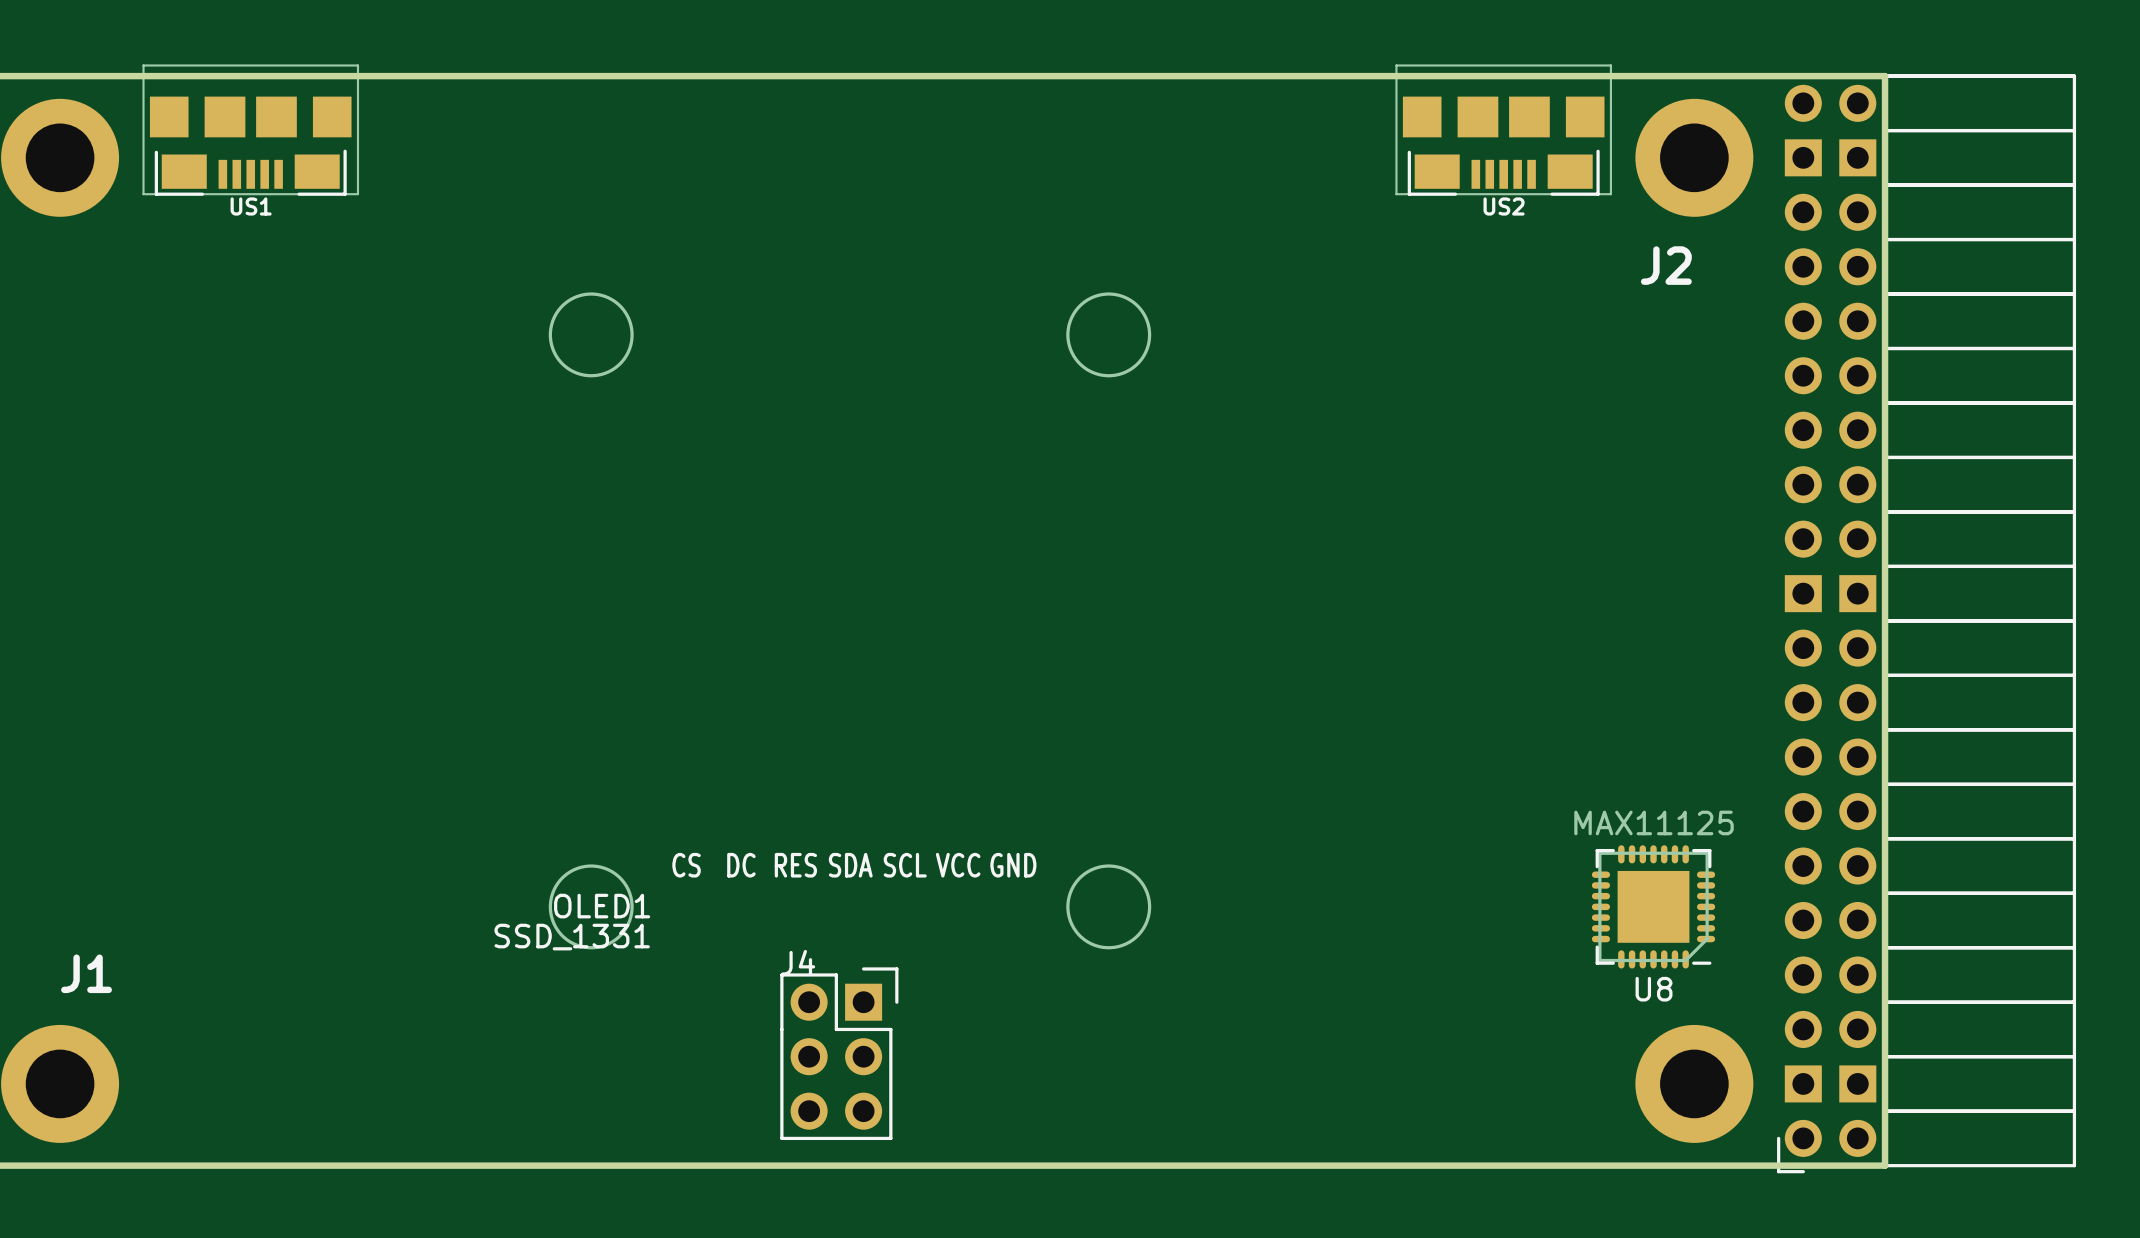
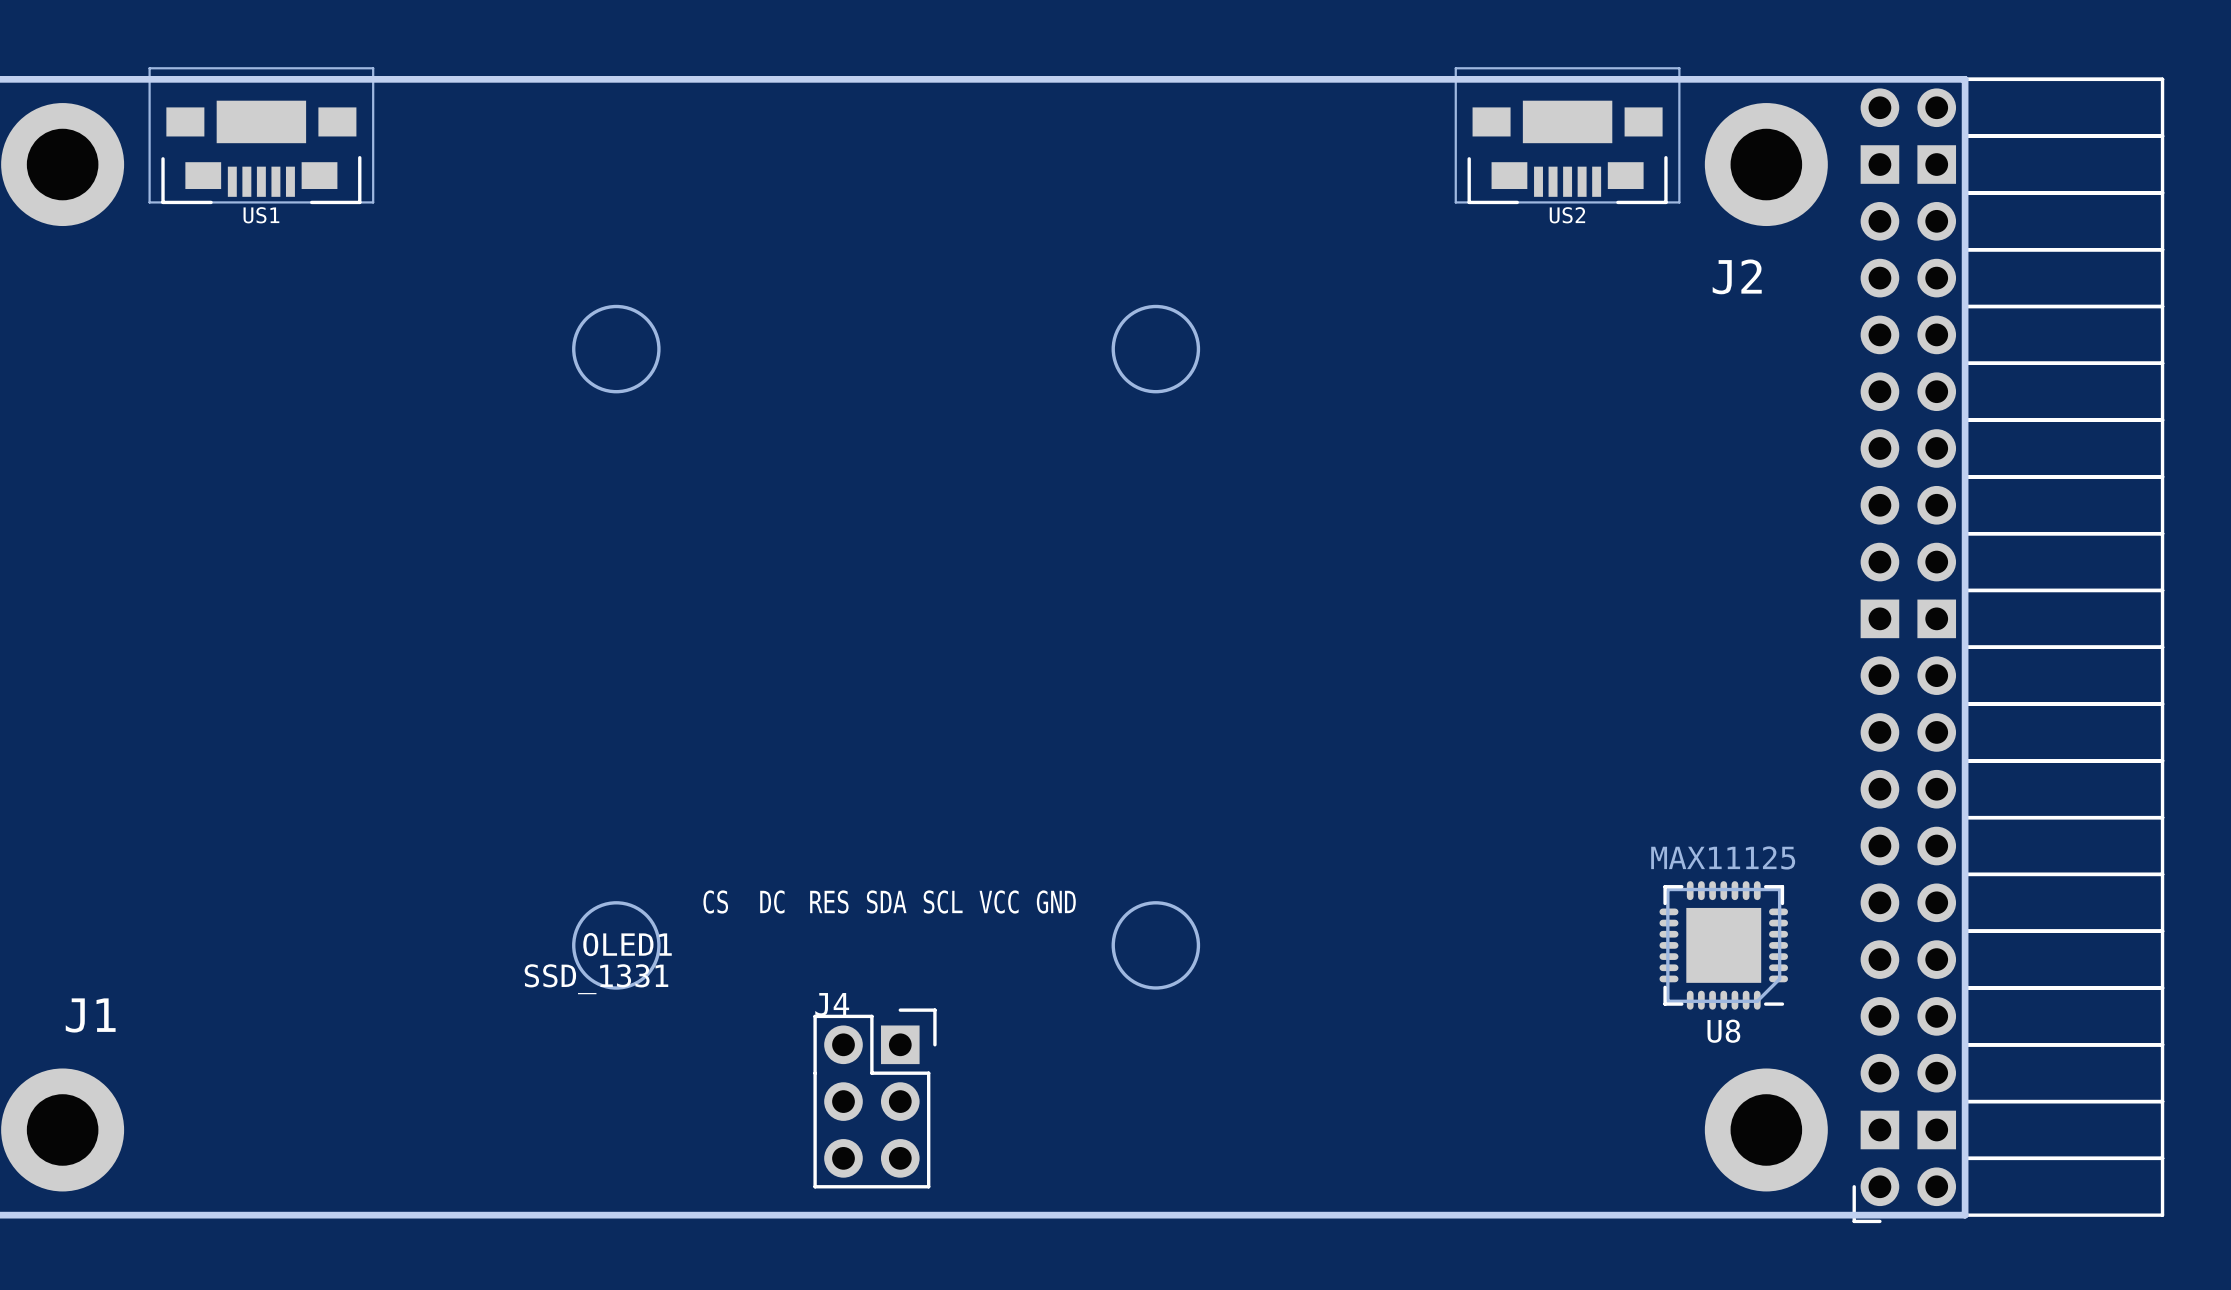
US1 footprint: [142, 64, 360, 196] -> [148, 67, 375, 205]
US2 footprint: [1395, 64, 1613, 196] -> [1454, 67, 1681, 205]

